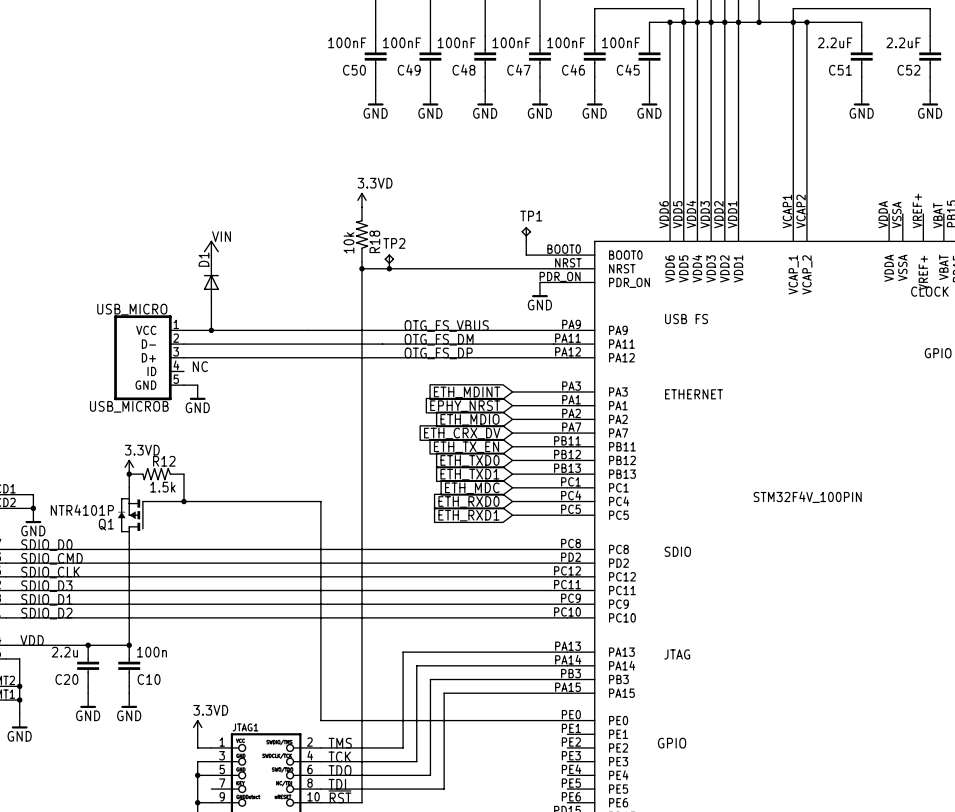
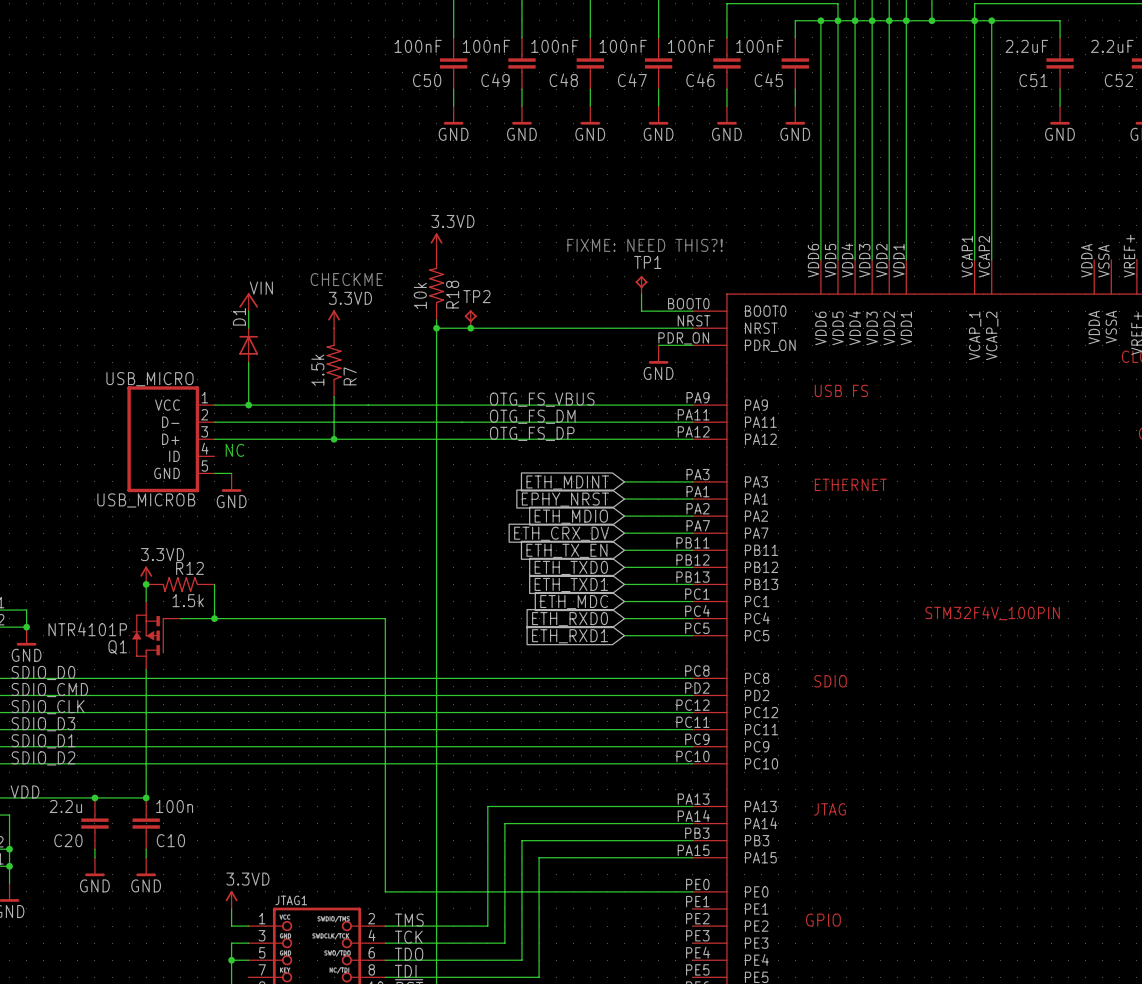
text: none -> FIXME: NEED THIS?! (644, 245)
text: none -> CHECKME (346, 279)
power symbol: none -> 3.3VD (334, 319)
R7: none -> 1.5k (334, 362)
wire: none -> (334, 396) (334, 439)
junction: none -> (334, 439)

